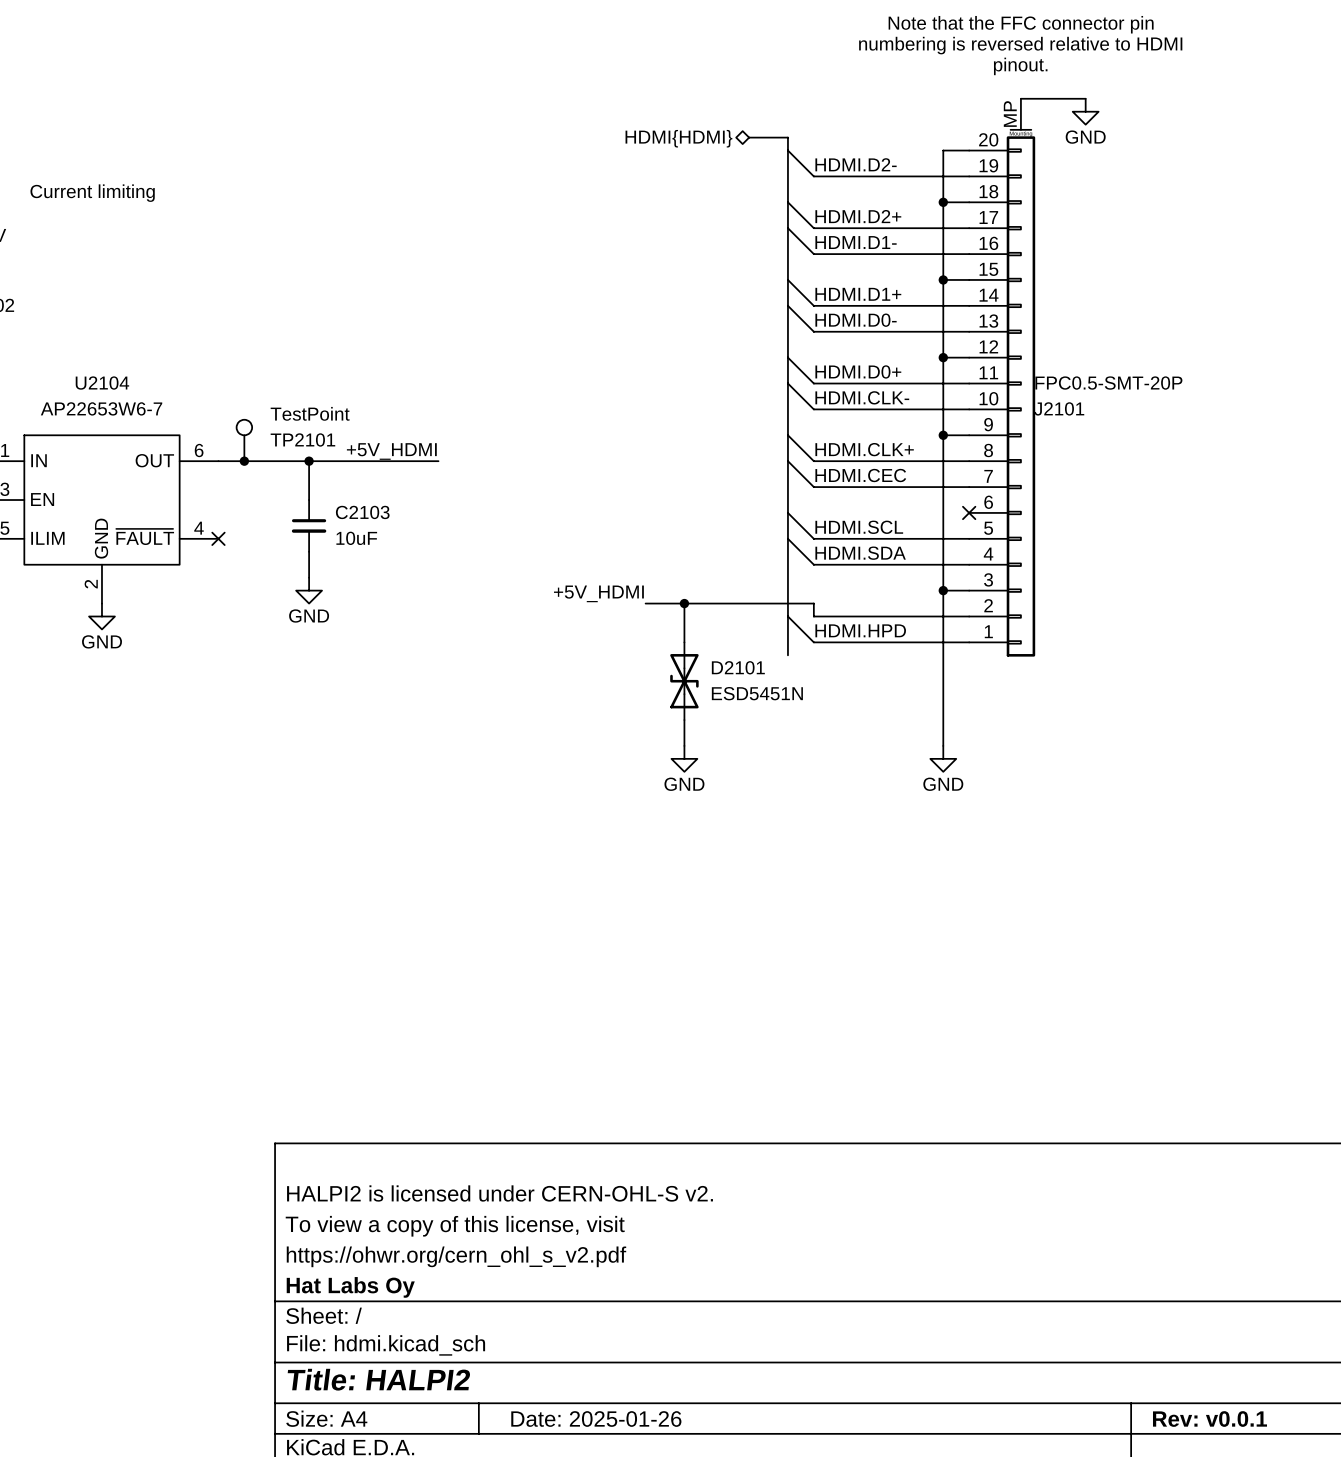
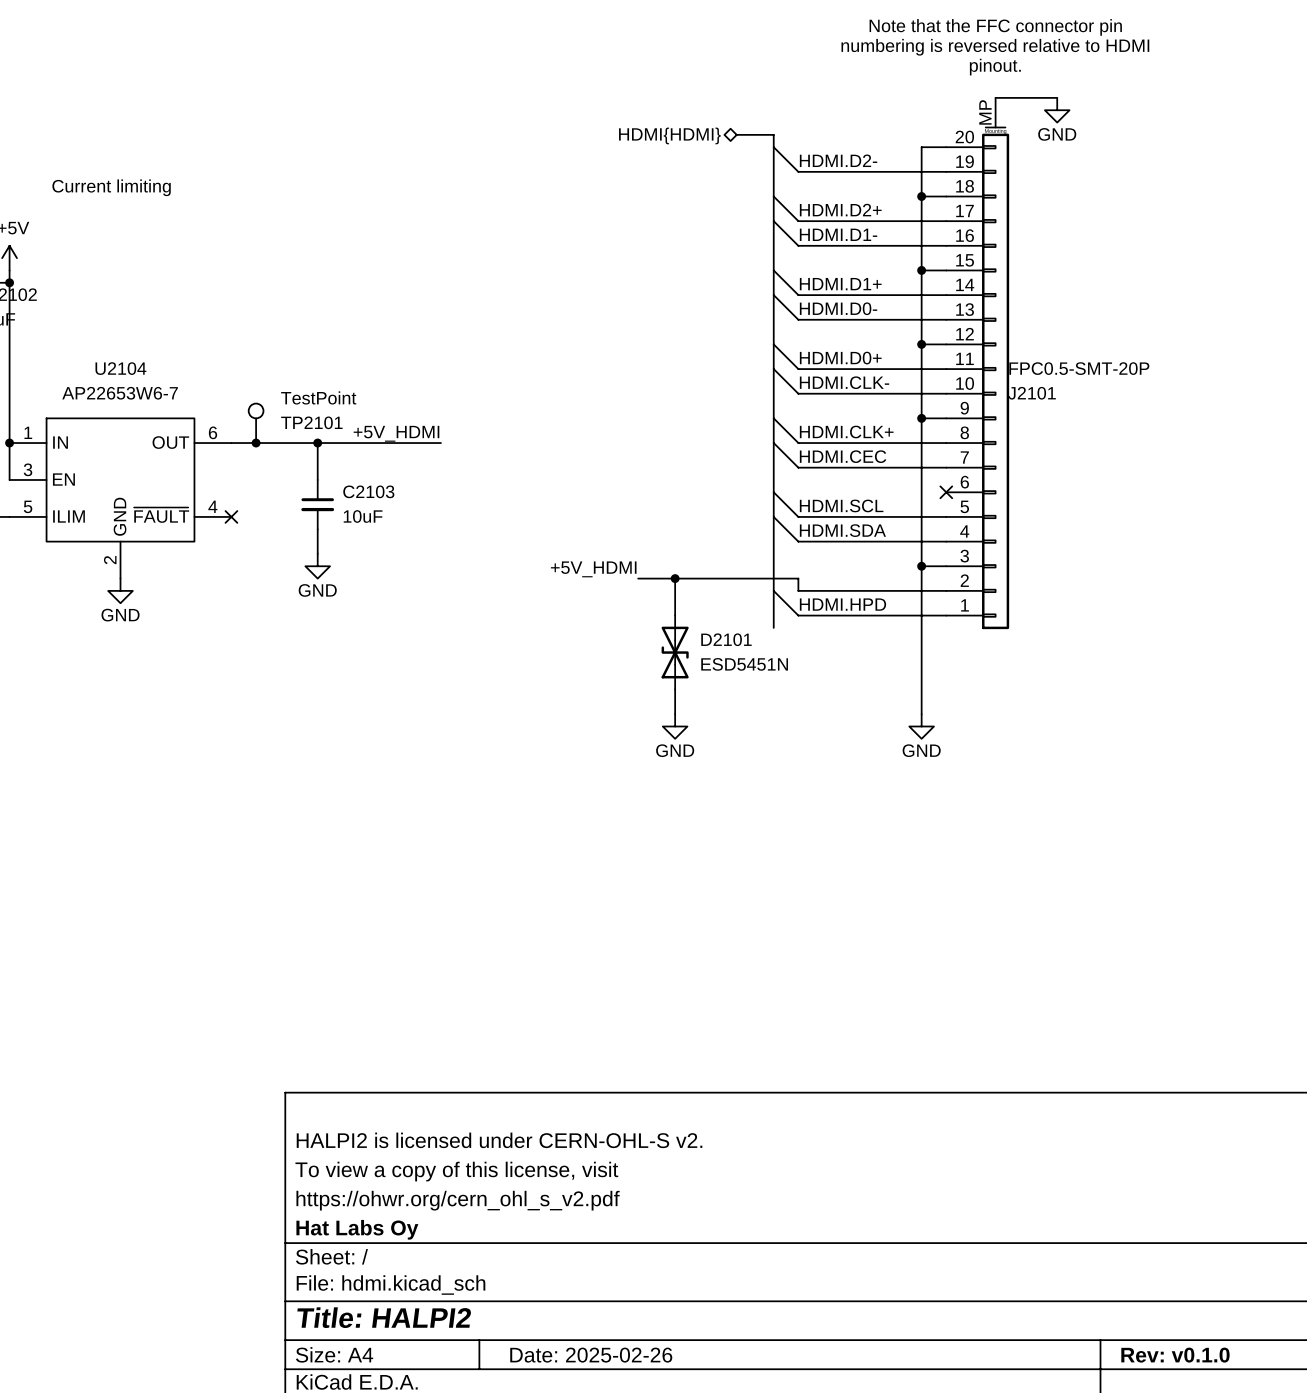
title block: Date: 2025-01-26 (596, 1419) -> Date: 2025-02-26 (591, 1355)
title block: Rev: v0.0.1 (1209, 1419) -> Rev: v0.1.0 (1175, 1355)

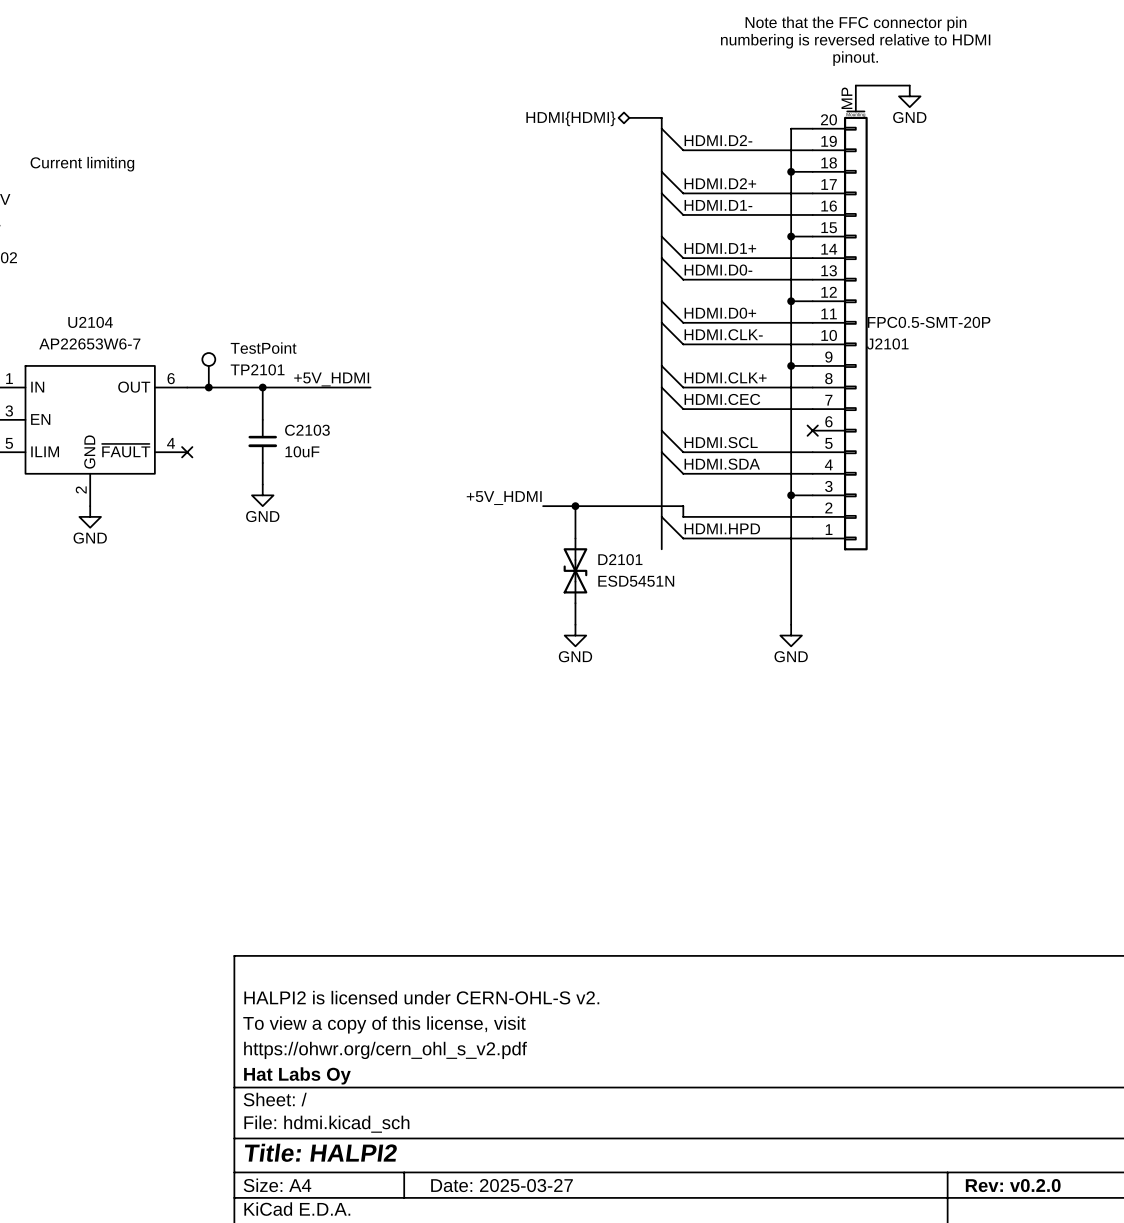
title block: Date: 2025-02-26 (591, 1355) -> Date: 2025-03-27 (502, 1185)
title block: Rev: v0.1.0 (1175, 1355) -> Rev: v0.2.0 (1013, 1185)

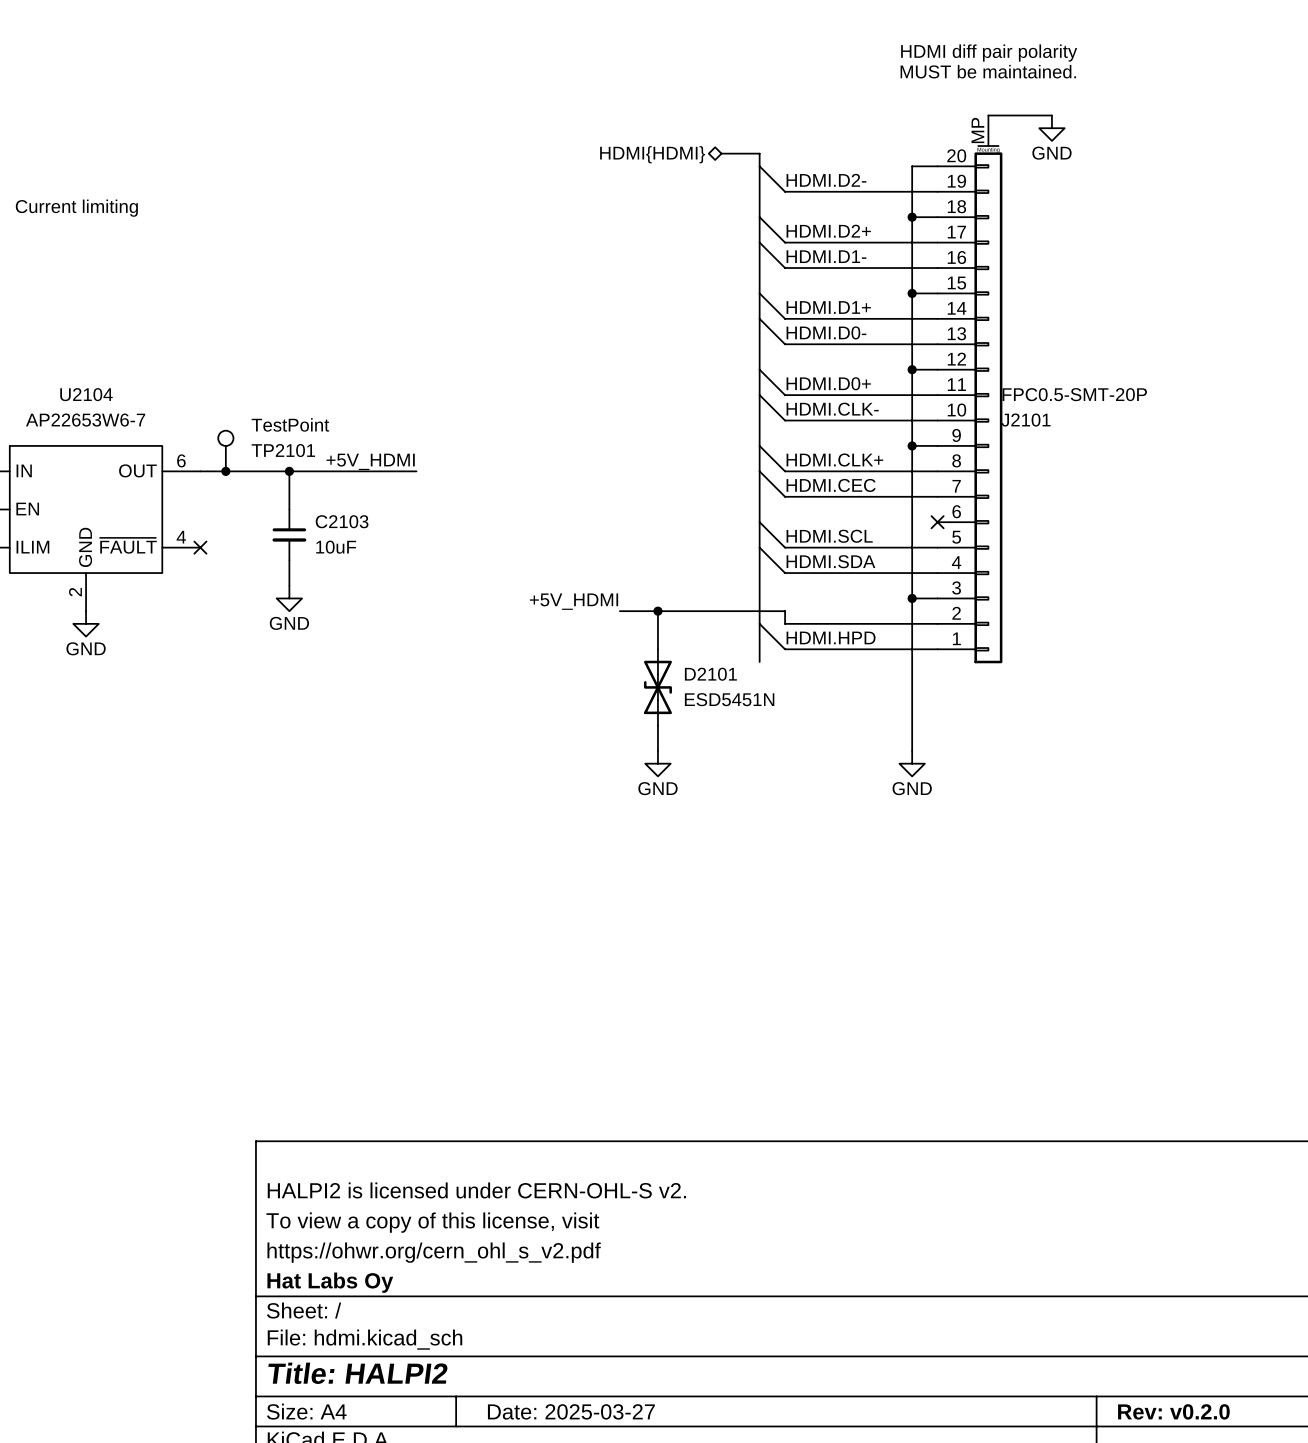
text: Note that the FFC connector pin (855, 23) -> none
text: none -> HDMI diff pair polarity (989, 53)
text: numbering is reversed relative to HDMI (855, 41) -> none
text: none -> MUST be maintained. (988, 71)
text: pinout. (855, 58) -> none

